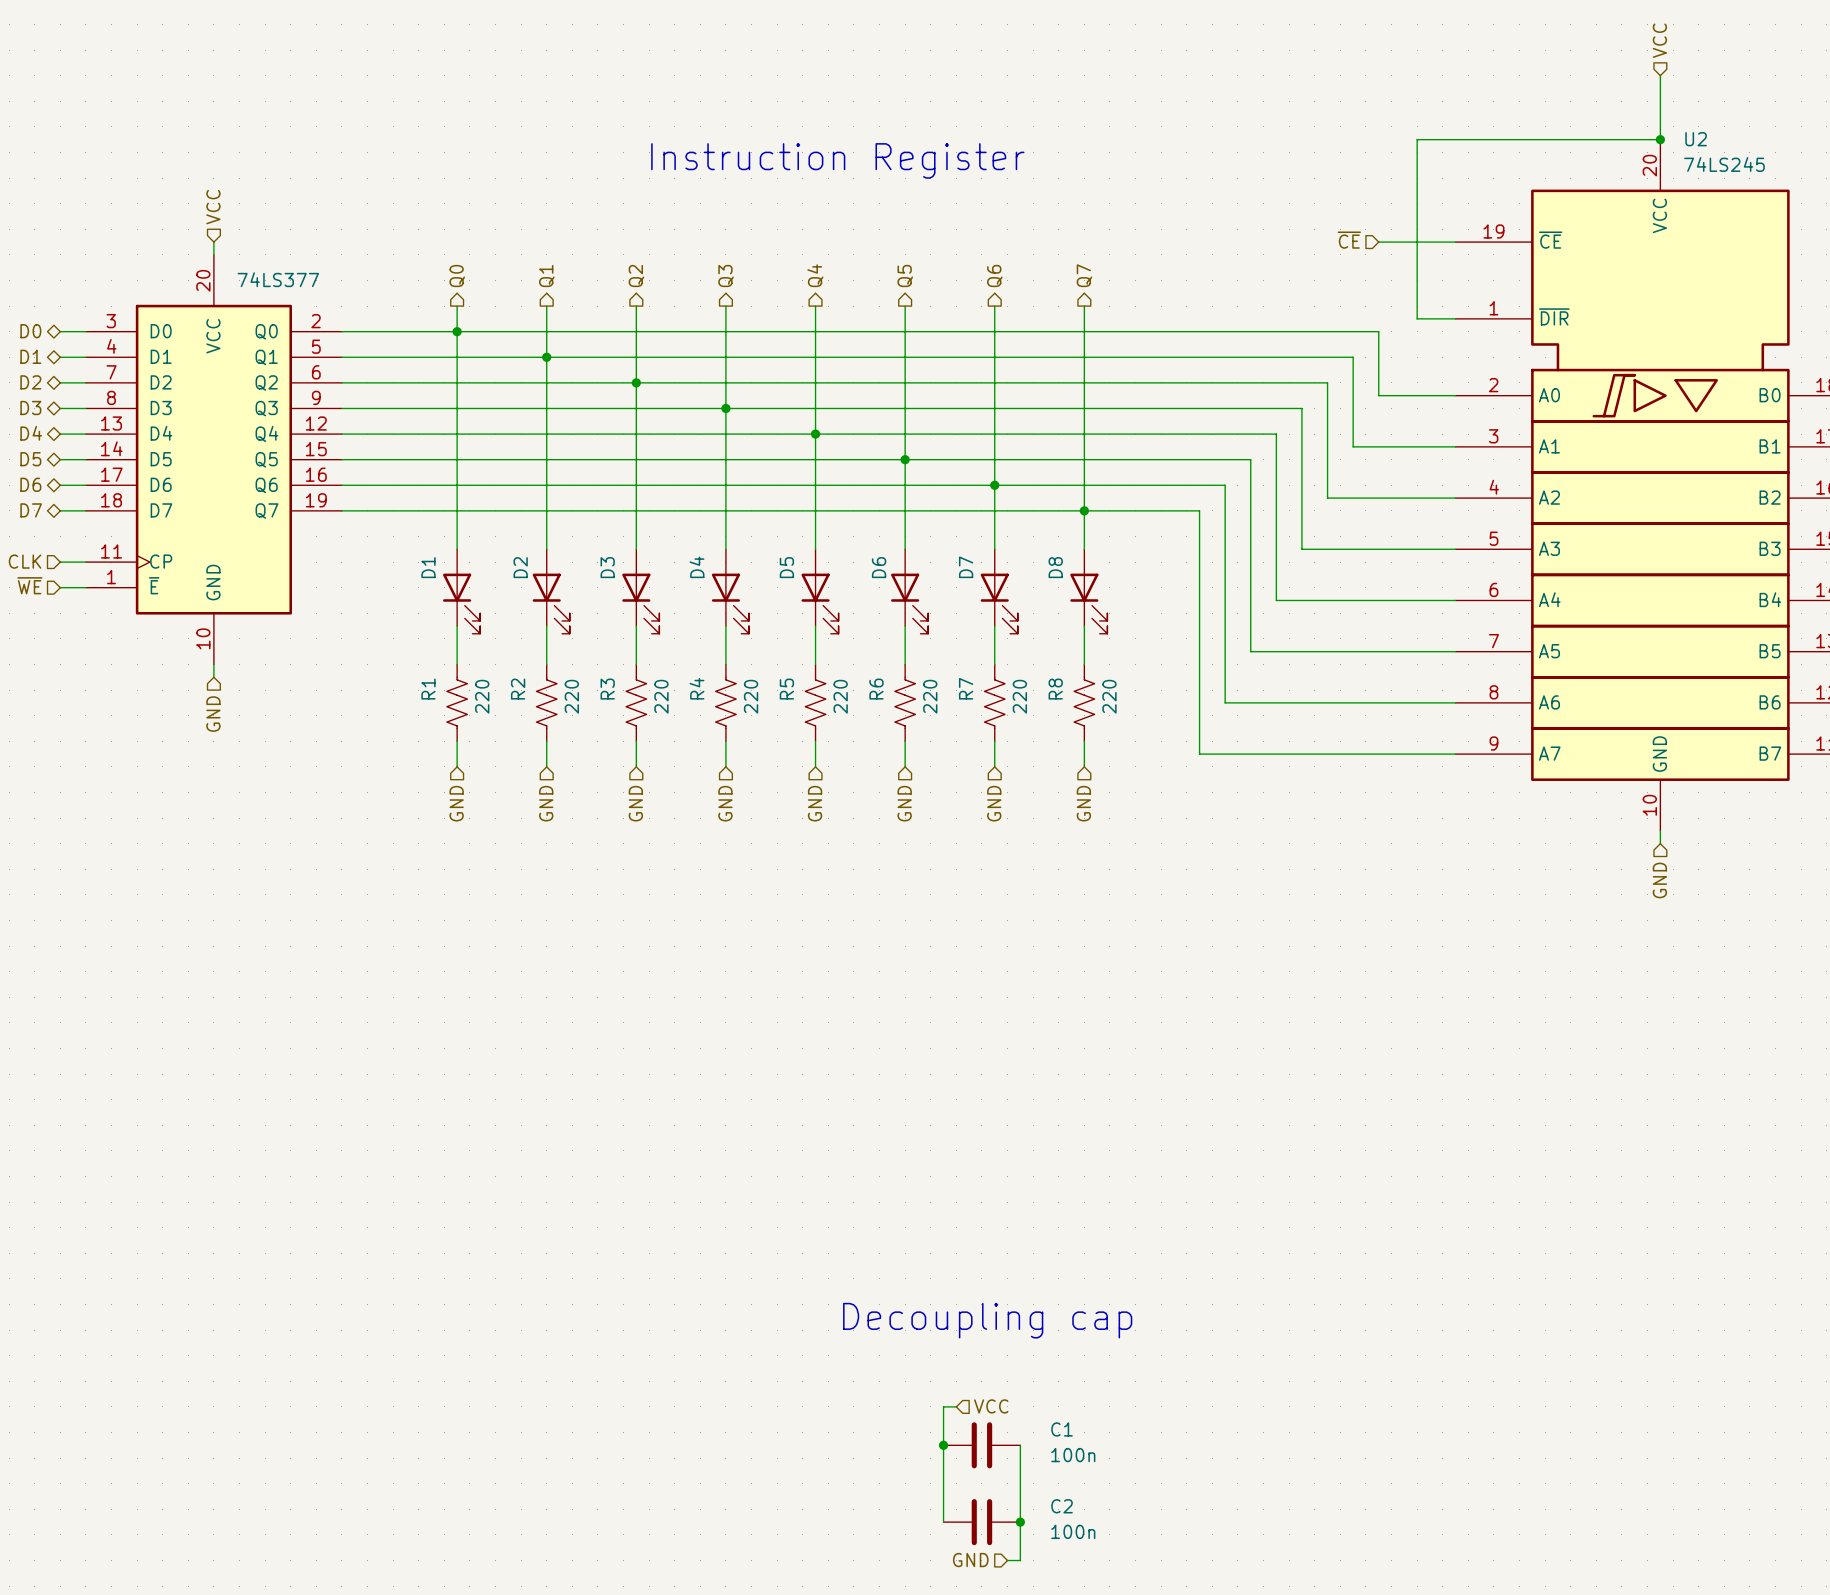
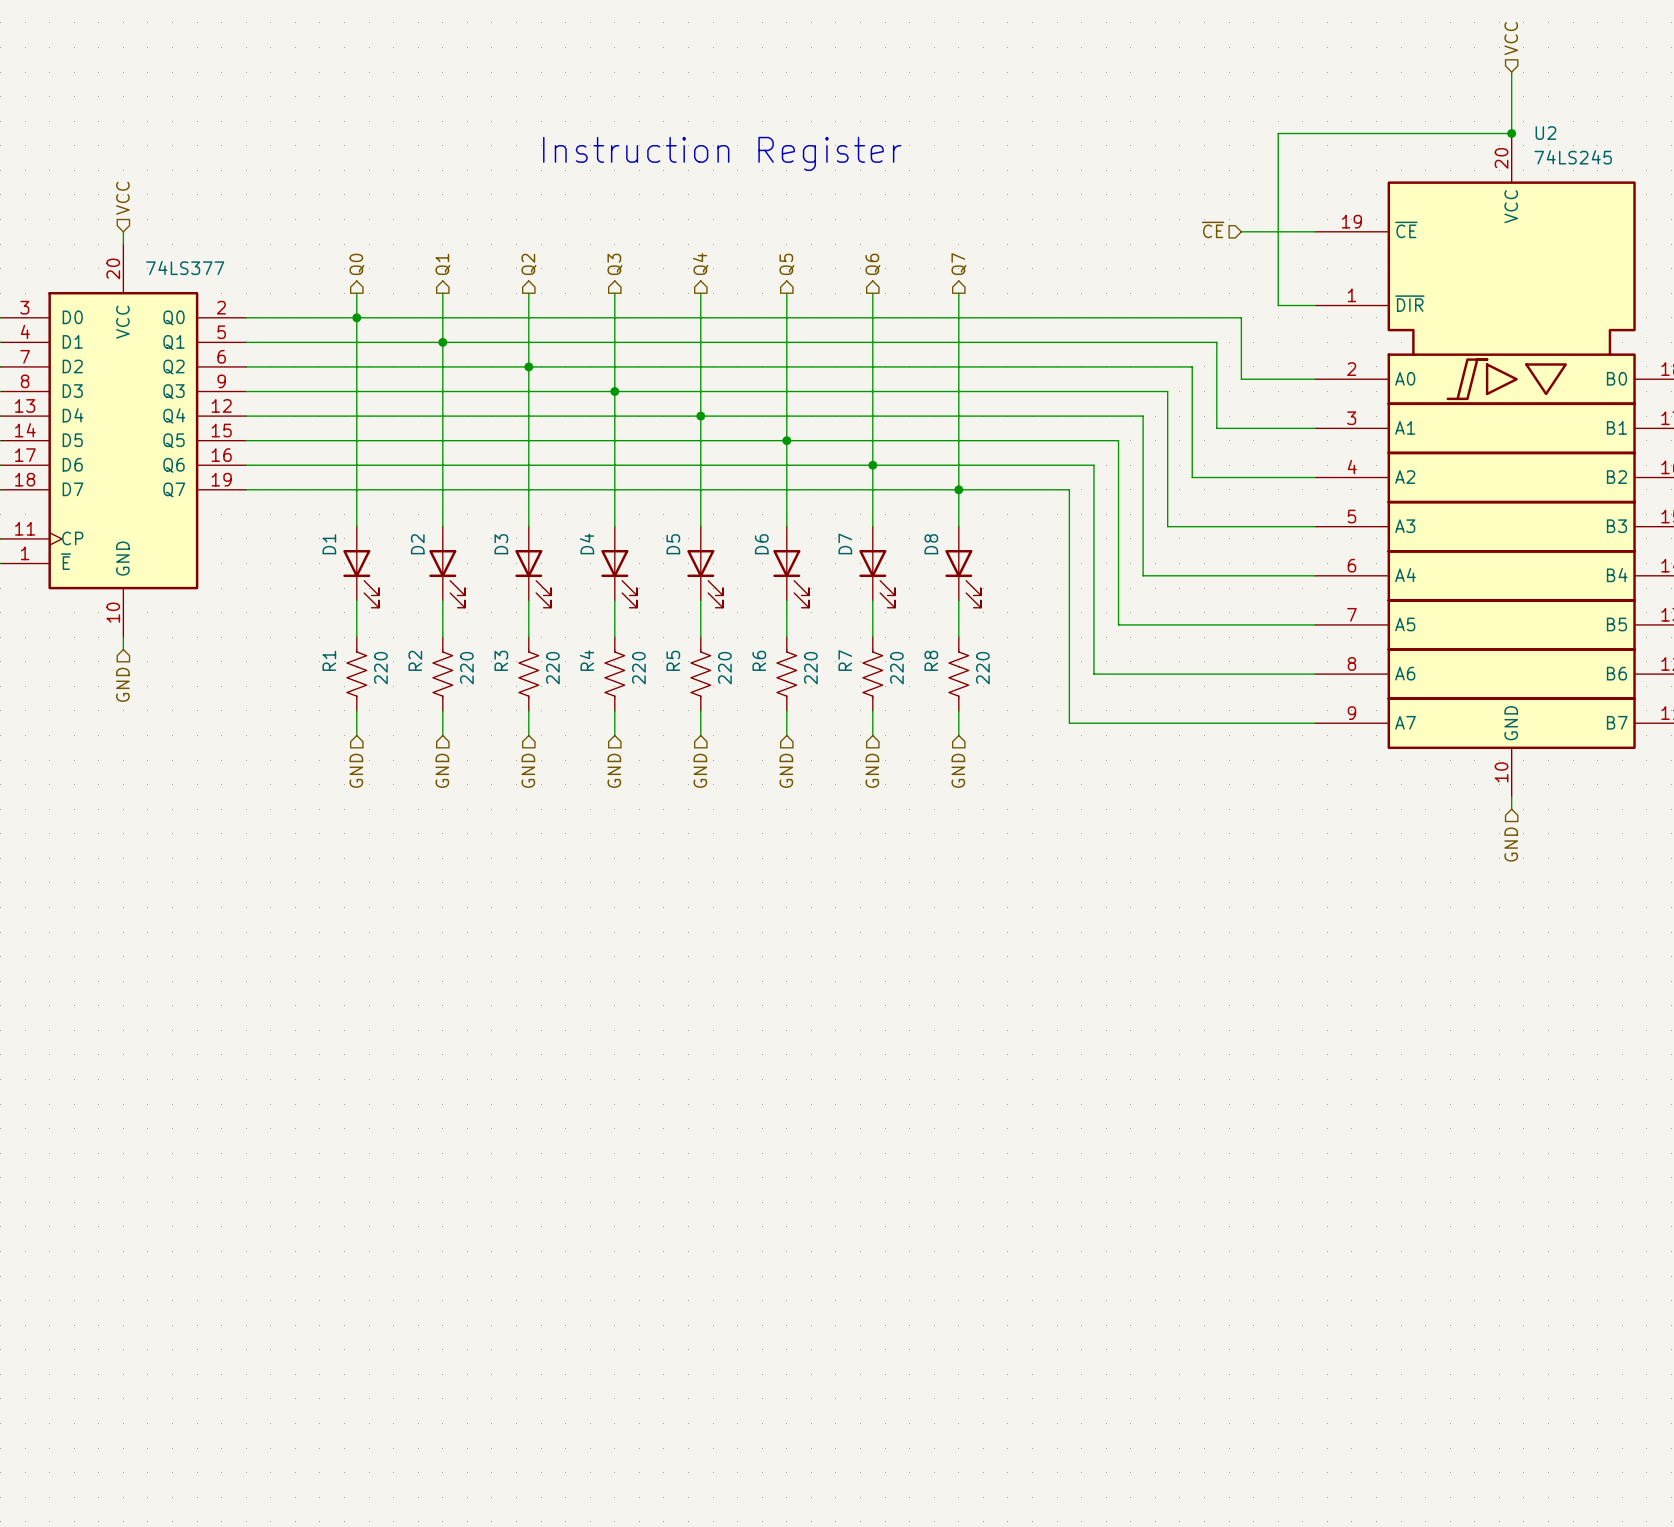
text: Decoupling cap (987, 1320) -> none
wire: (956, 1406) (943, 1406) (943, 1522) -> none
hierarchical label: VCC (991, 1406) -> none
junction: (943, 1445) -> none
C1: 100n (981, 1445) -> none
wire: (1020, 1445) (1020, 1560) (1007, 1560) -> none
C2: 100n (981, 1522) -> none
junction: (1020, 1522) -> none
hierarchical label: GND (970, 1560) -> none

